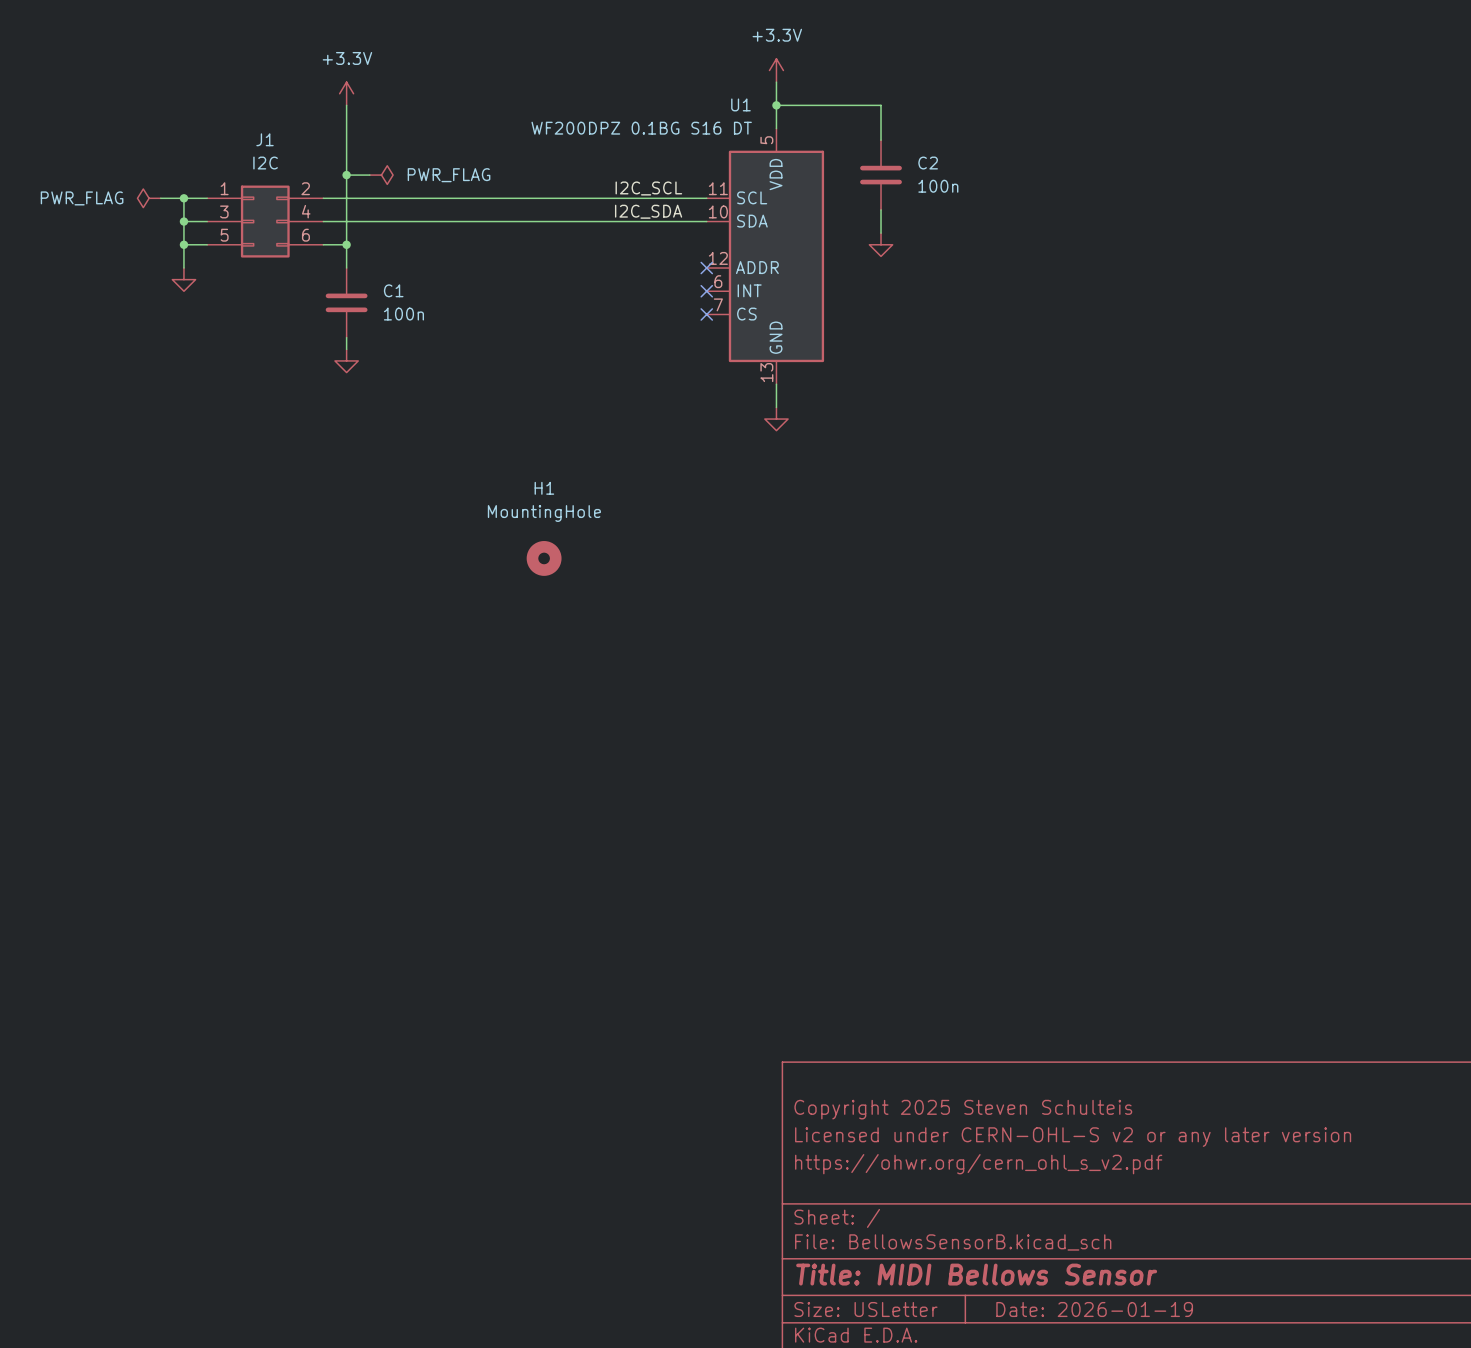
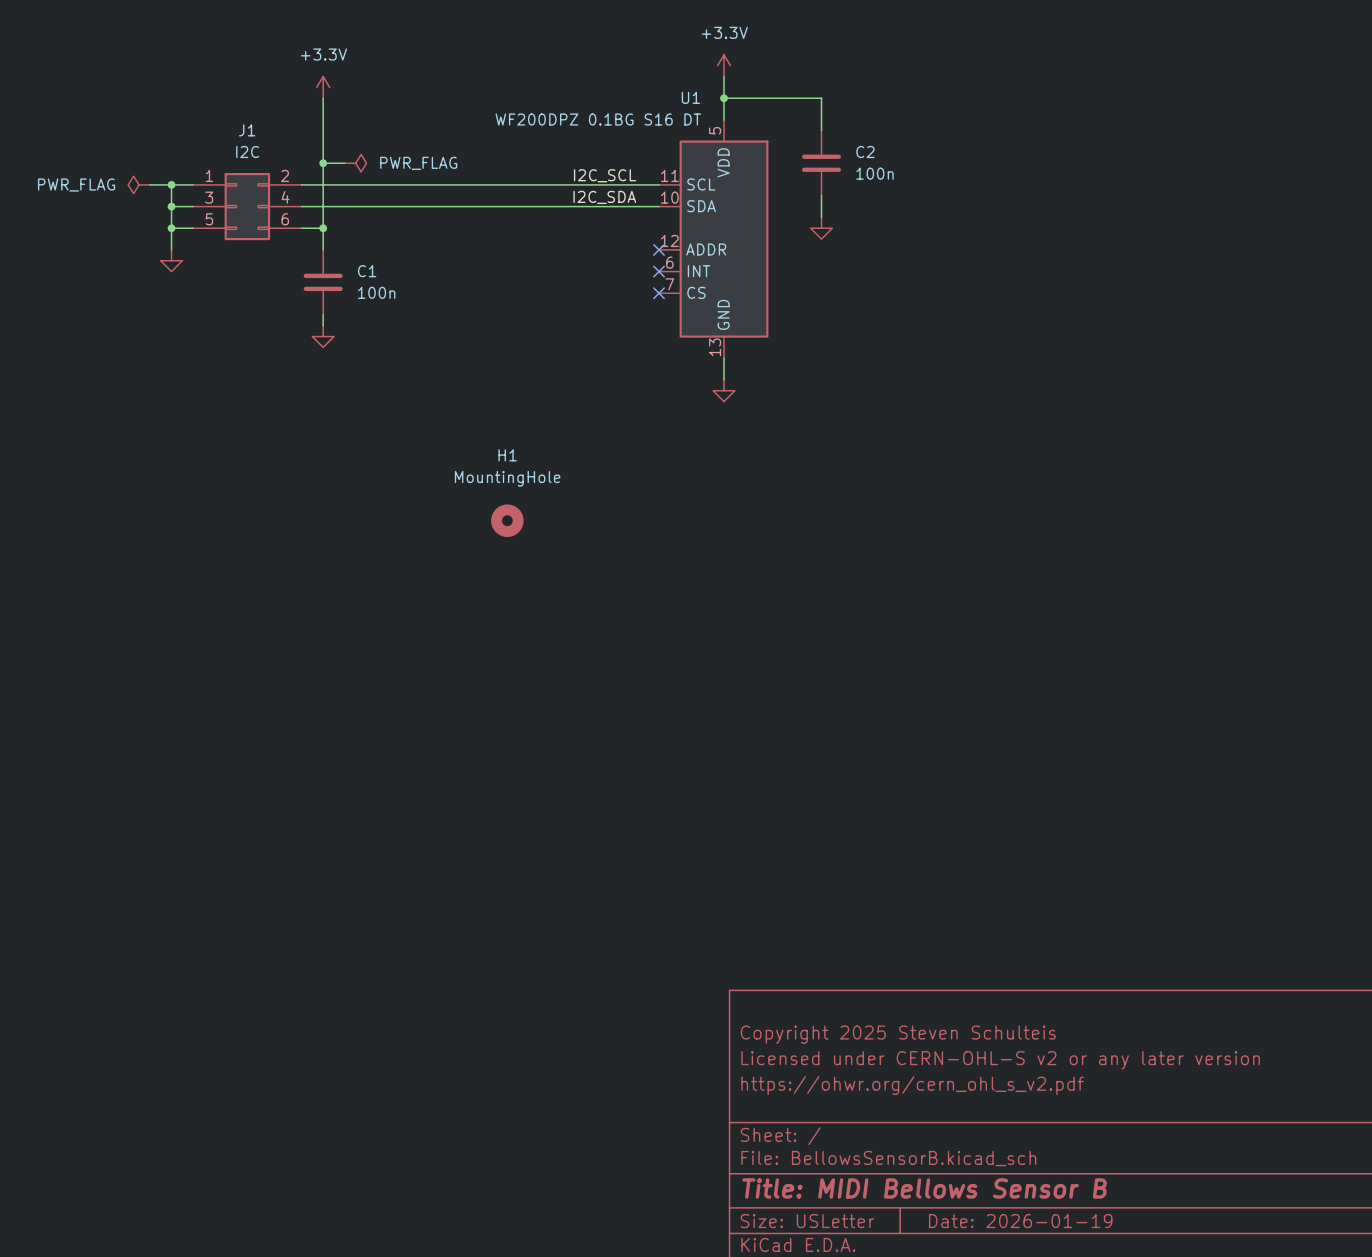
title block: Title: MIDI Bellows Sensor (976, 1274) -> Title: MIDI Bellows Sensor B (924, 1188)

